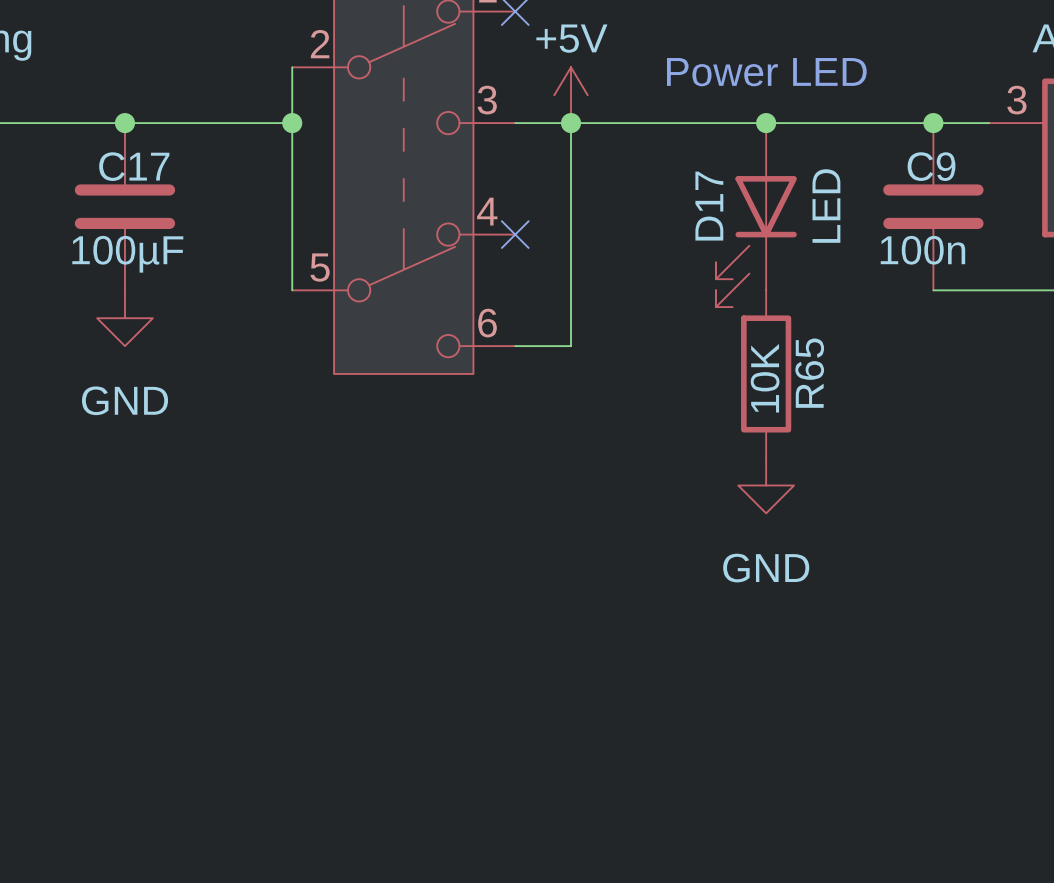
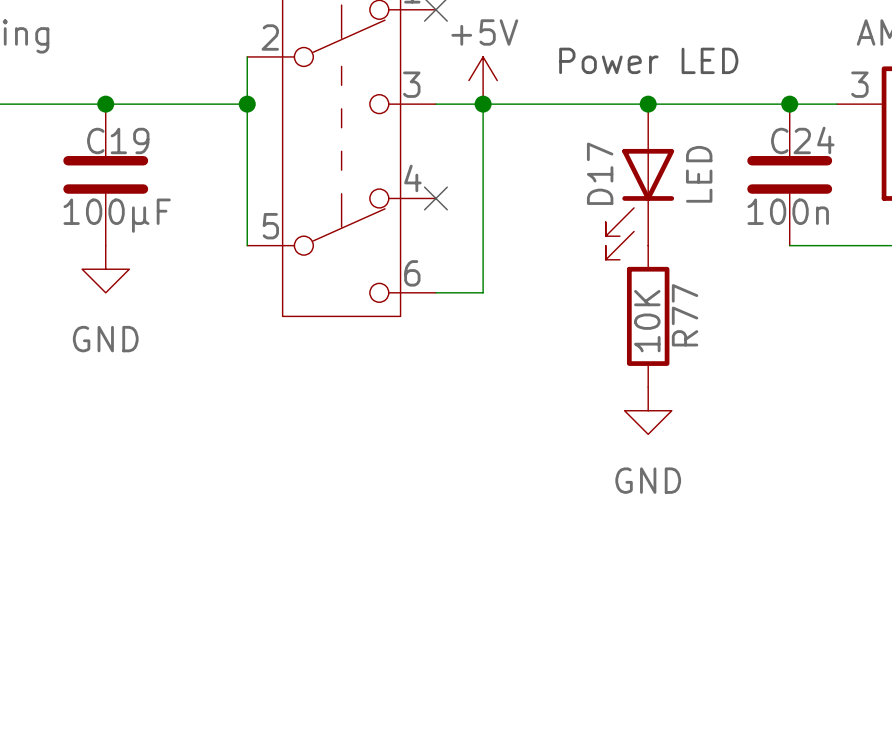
C17 name: C17 (134, 166) -> C19 (118, 140)
C9 name: C9 (931, 166) -> C24 (802, 140)
R65 name: R65 (809, 373) -> R77 (685, 315)

